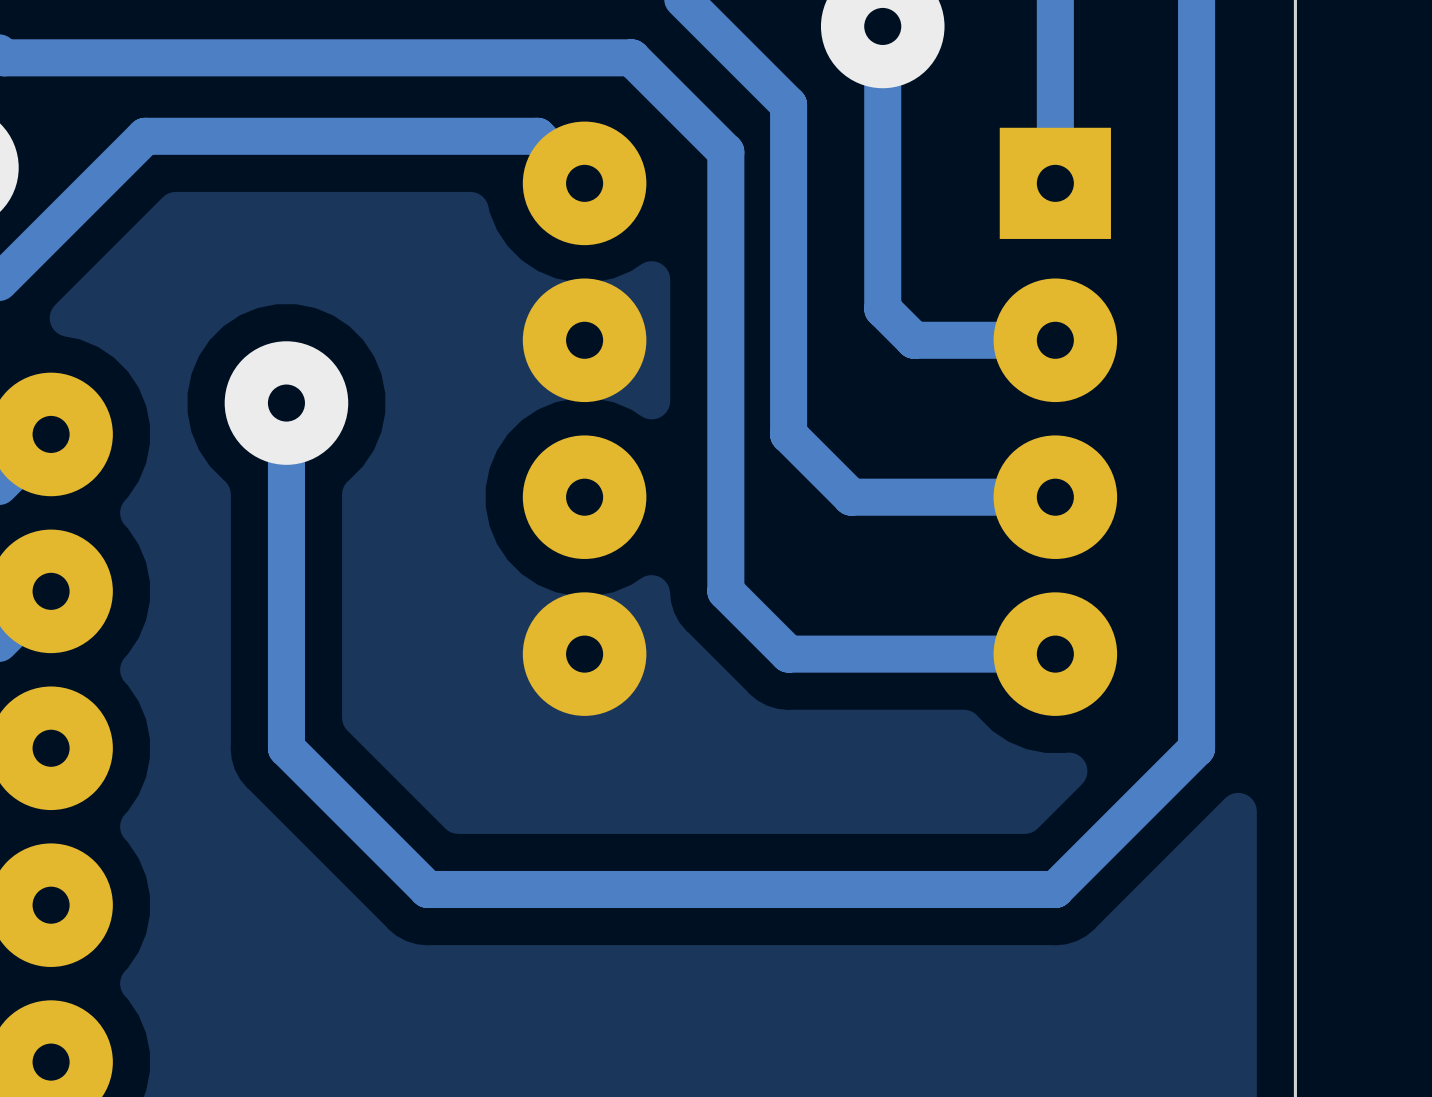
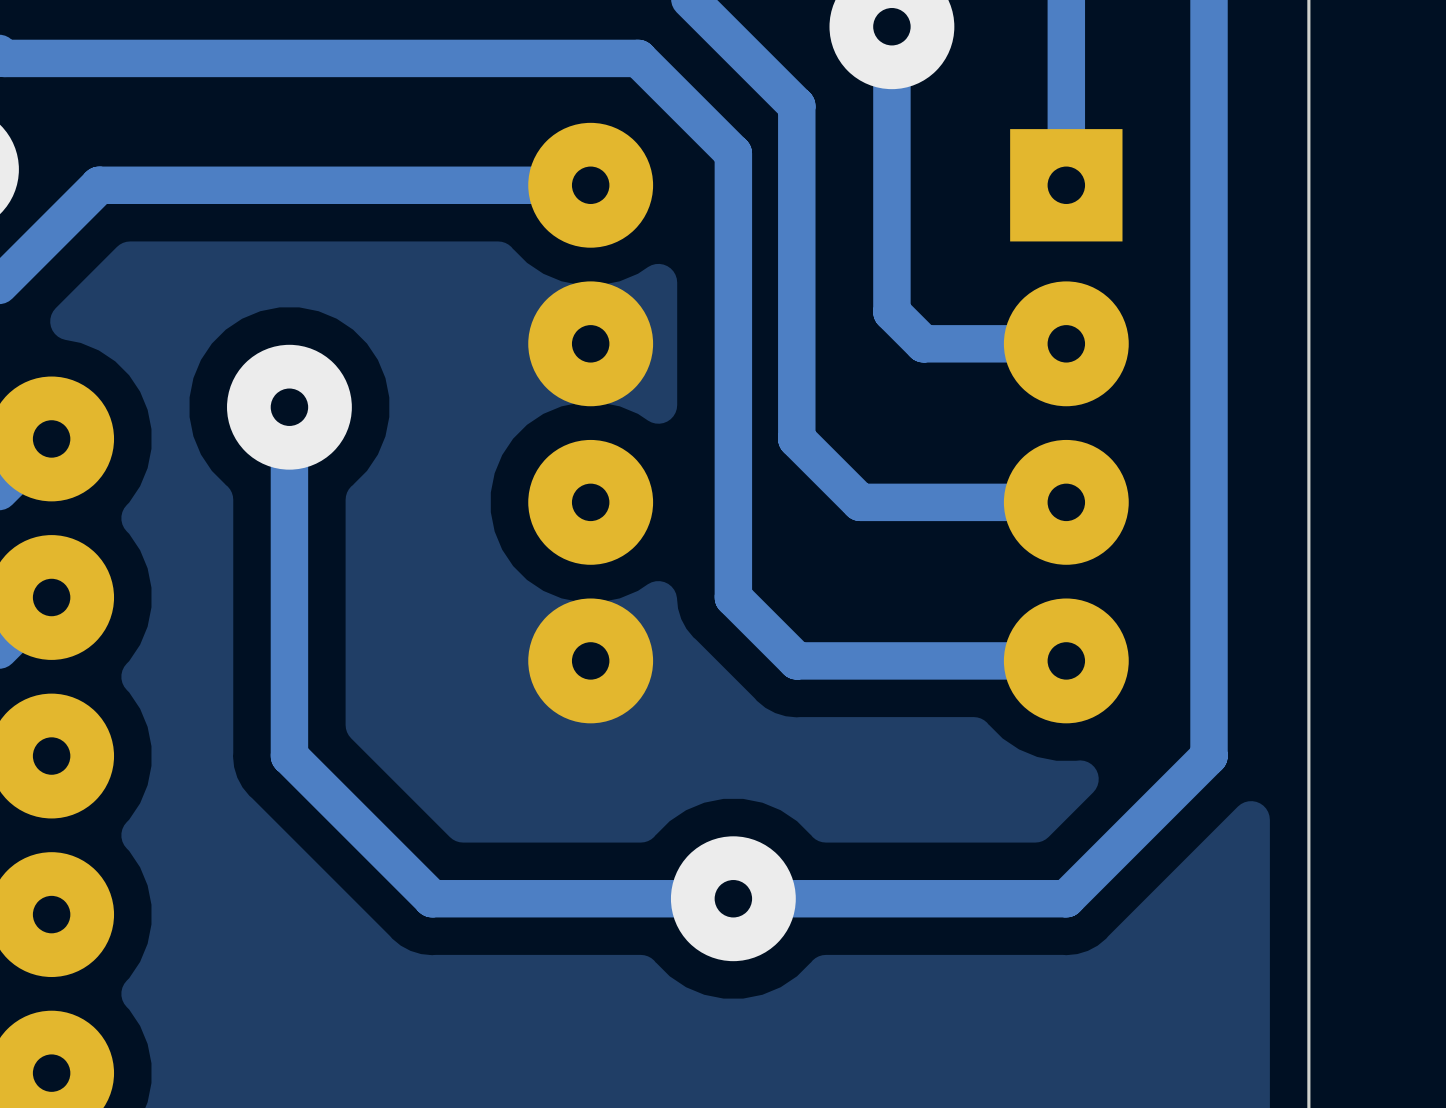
track: (584, 183) (537, 136) (145, 136) (98, 183) -> (590, 185) (99, 185)
via: none -> (733, 898)

